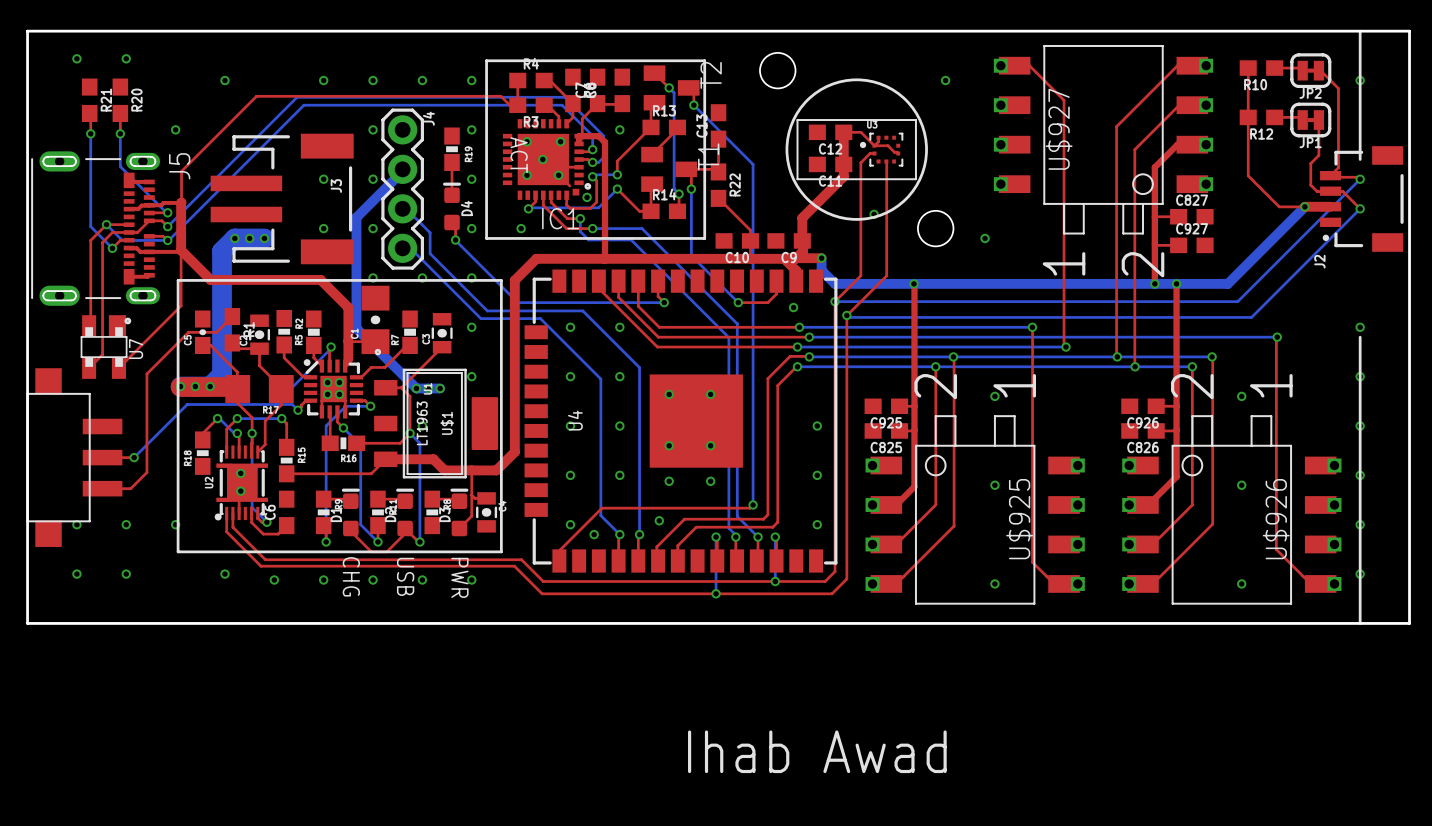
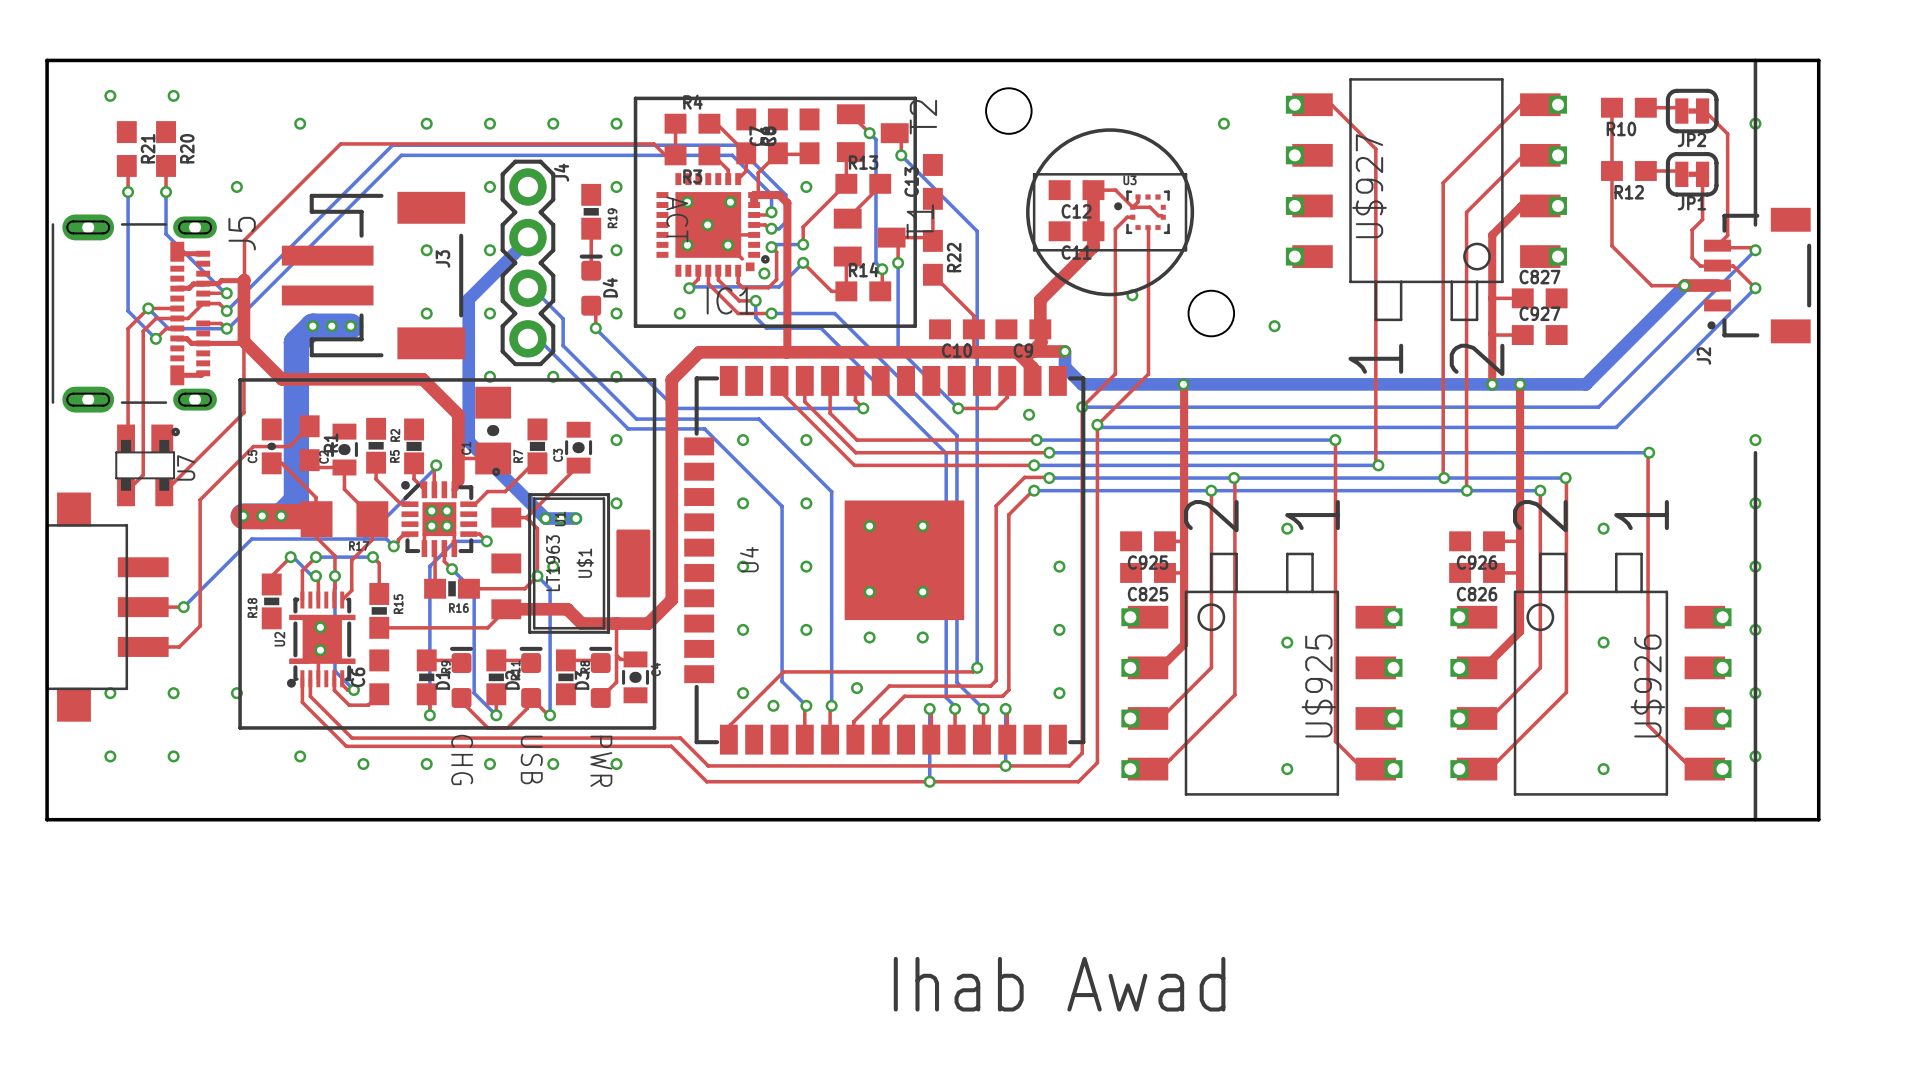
drawing shape: [785, 78, 928, 221] -> [1026, 128, 1195, 297]

